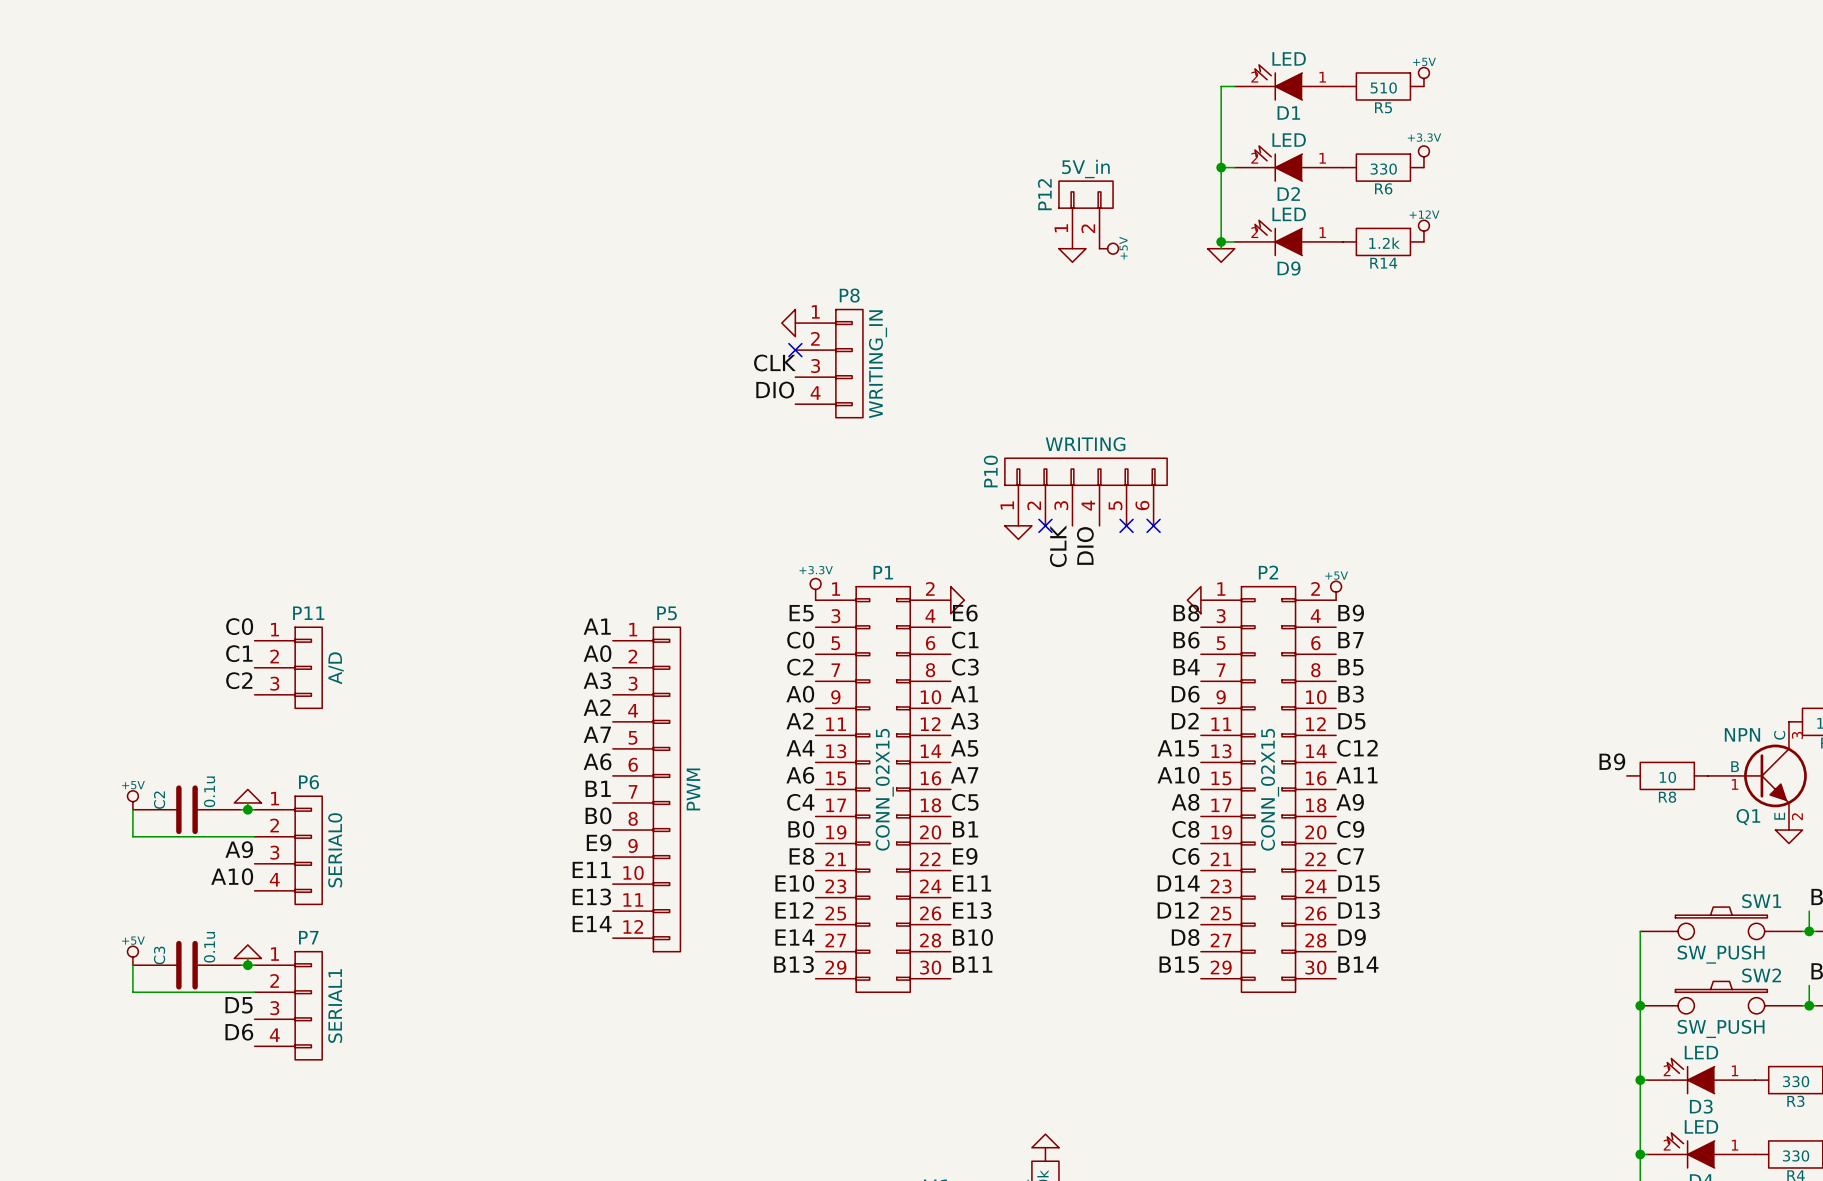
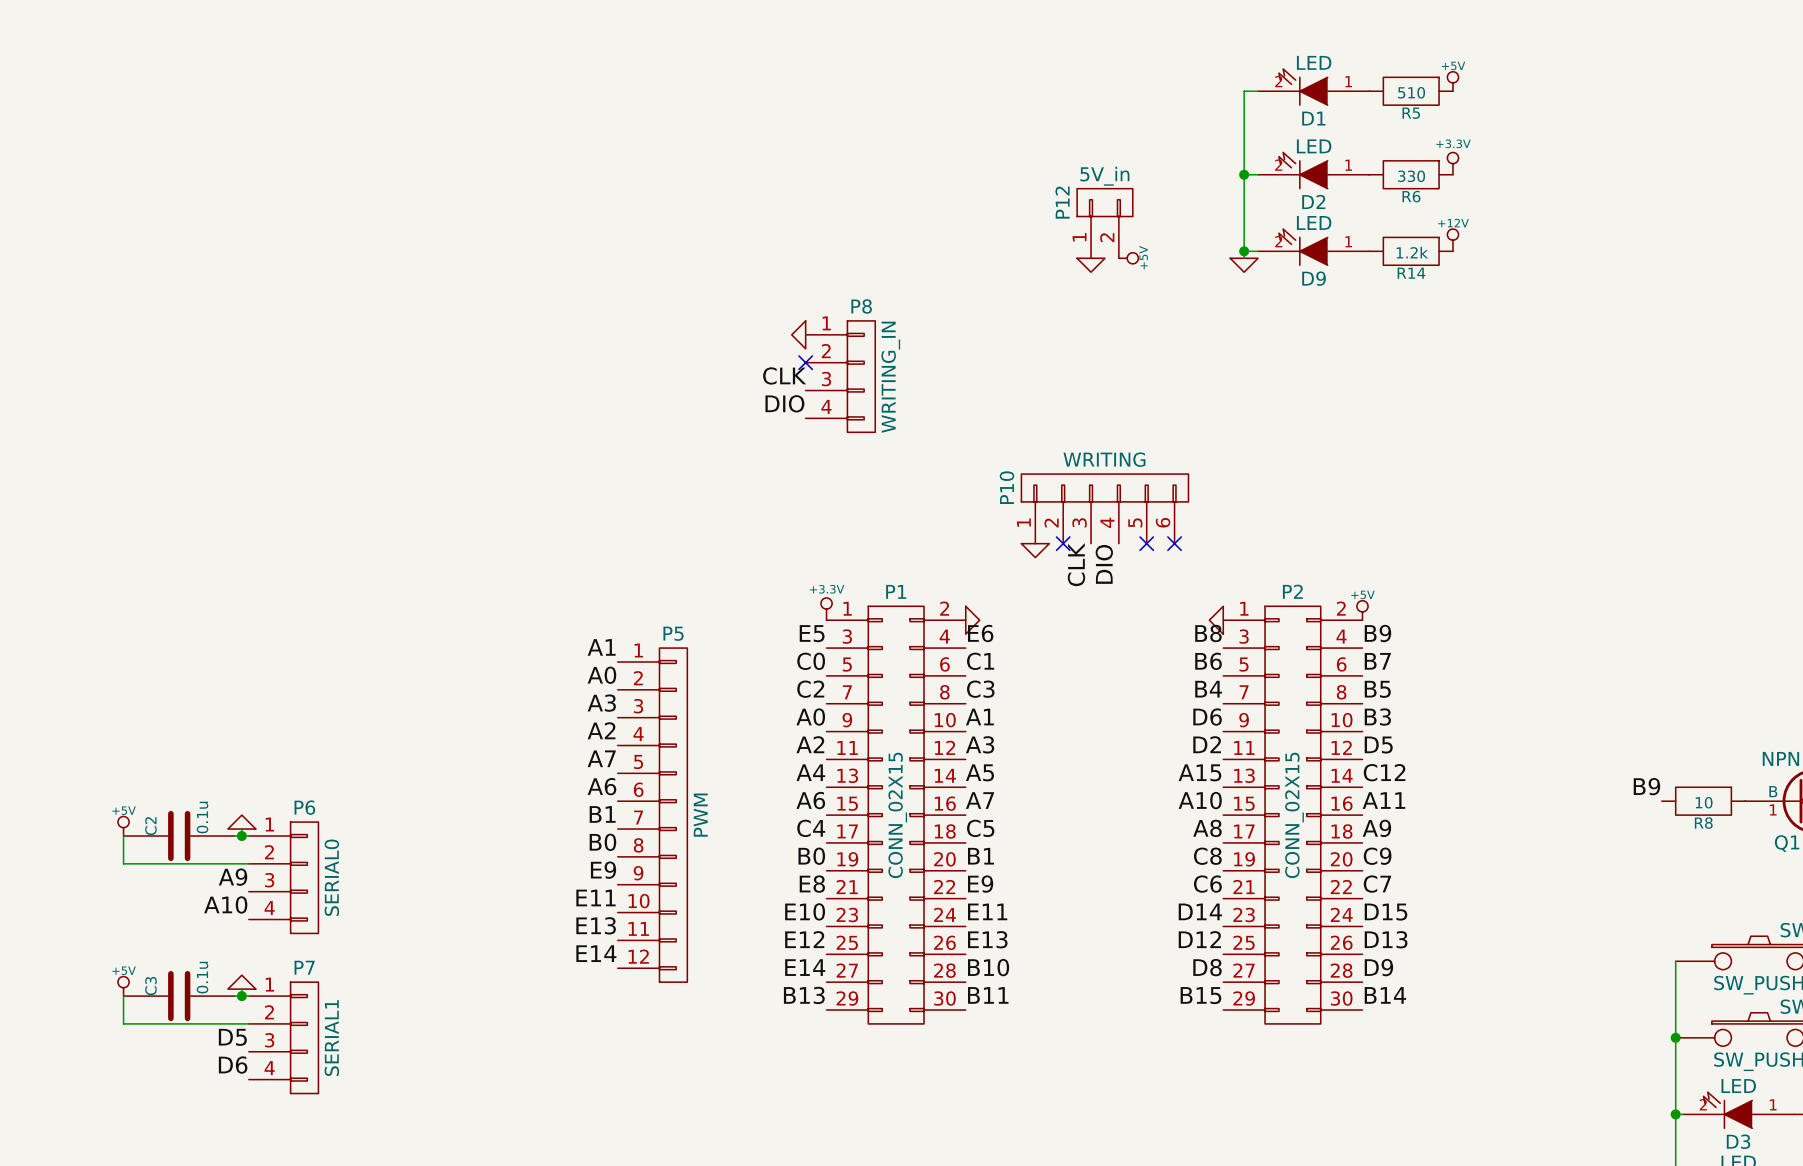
label: C0 (239, 626) -> none
label: C1 (239, 653) -> none
P11: A/D (288, 667) -> none
label: C2 (239, 680) -> none

